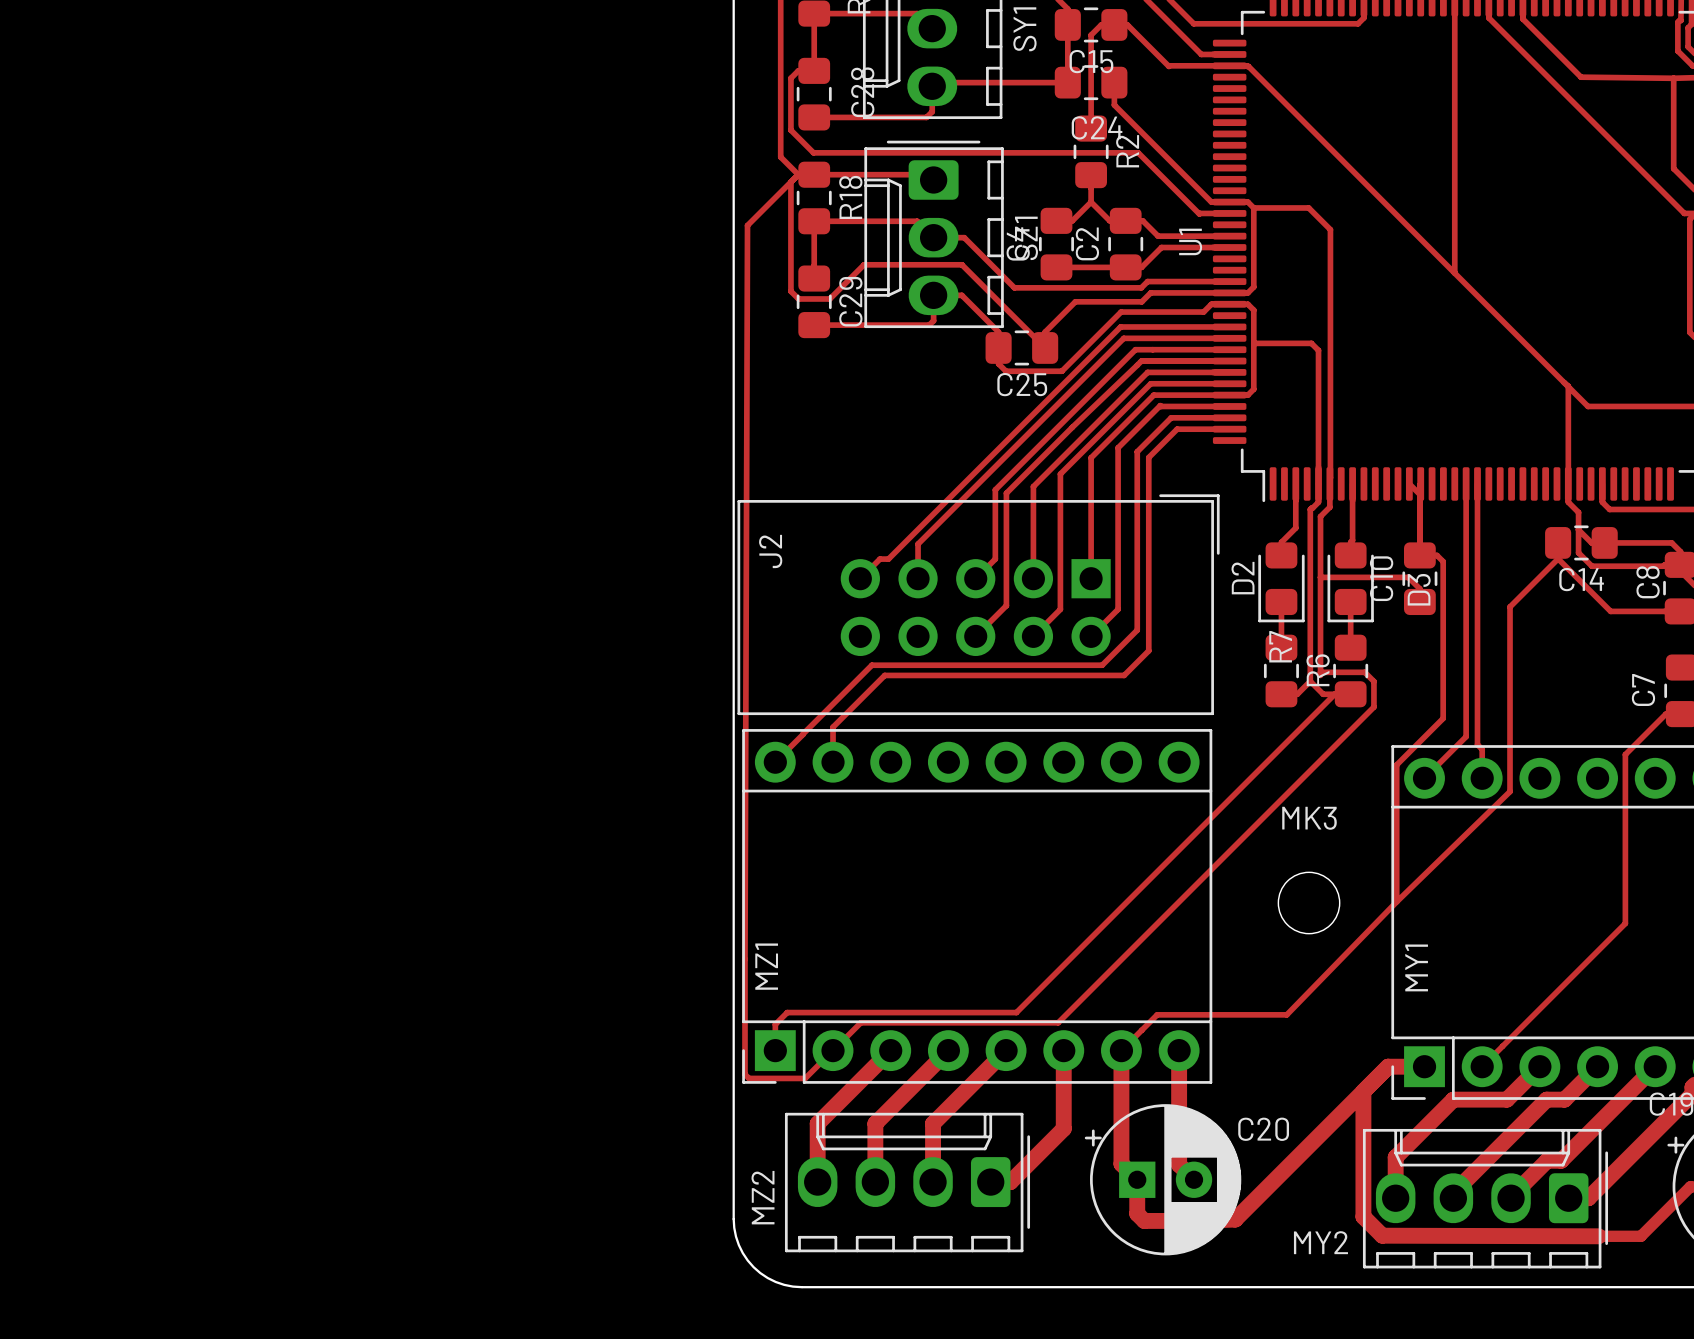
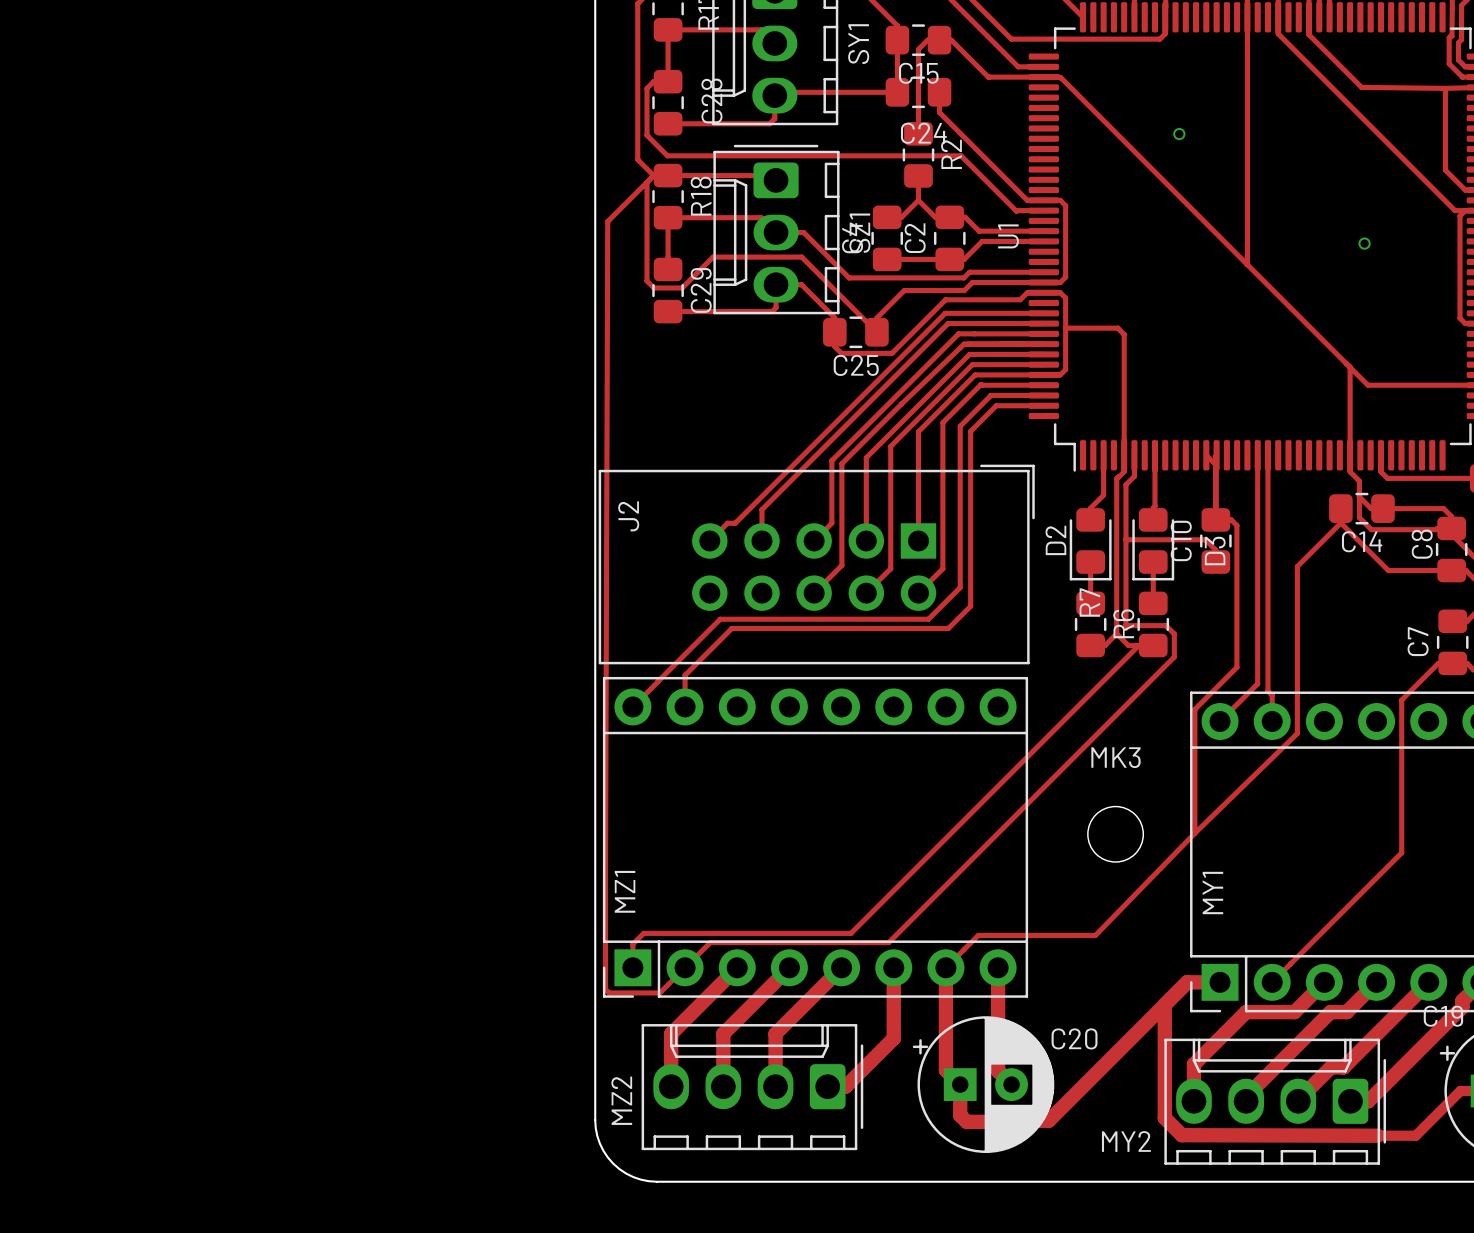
via: none -> (1179, 134)
track: (1253, 207) (1308, 207) (1330, 229) (1330, 477) -> none
via: none -> (1364, 243)

